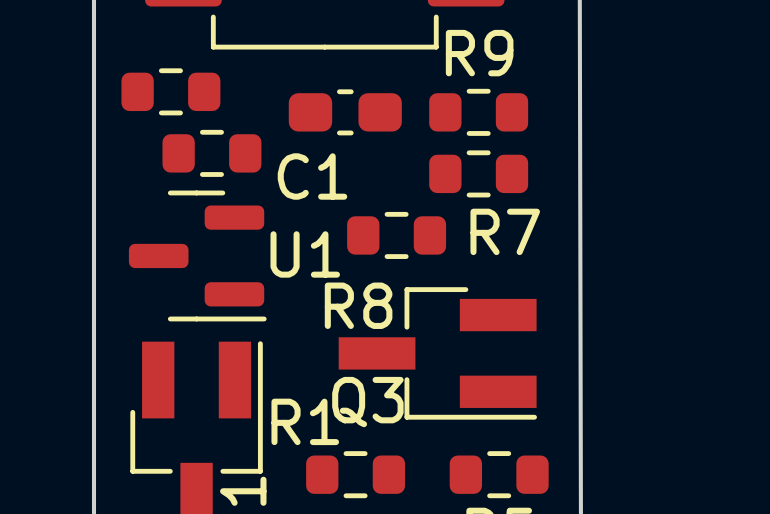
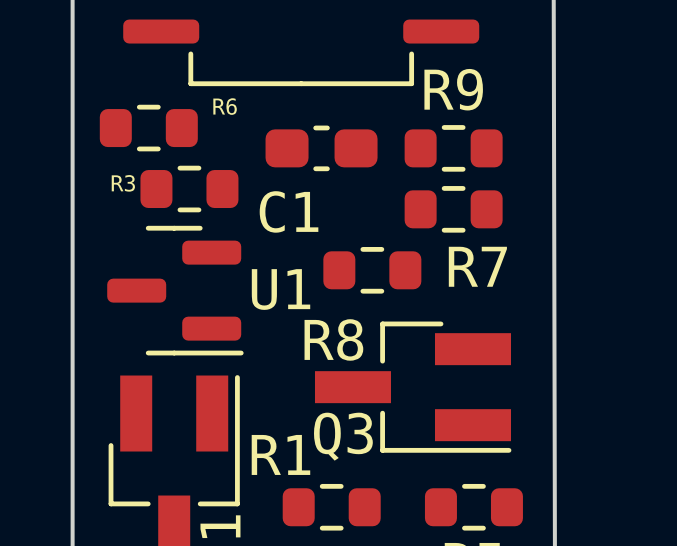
R6 name: none -> R6 (225, 106)
R3 name: none -> R3 (123, 183)

